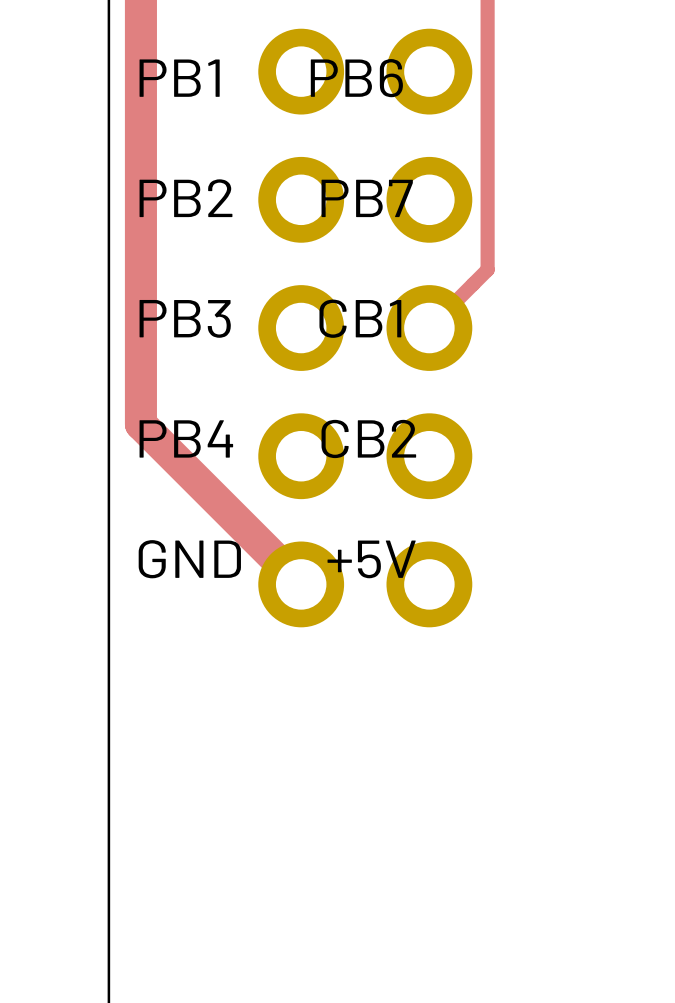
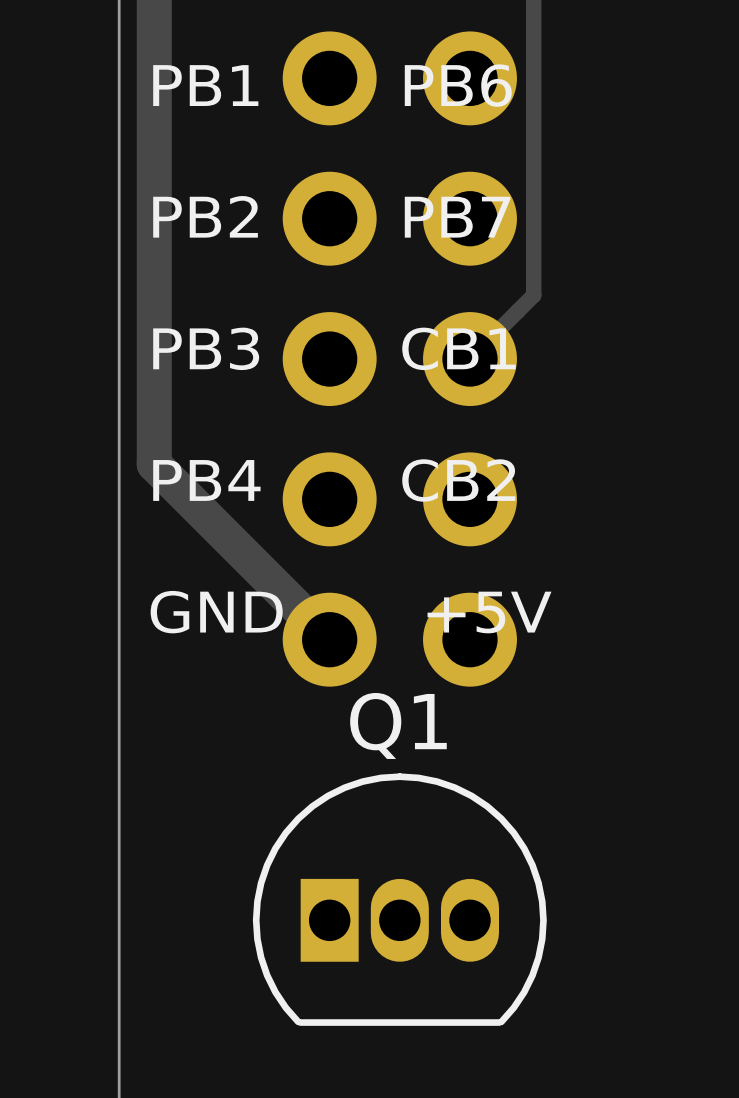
Q1: none -> (399, 899)

